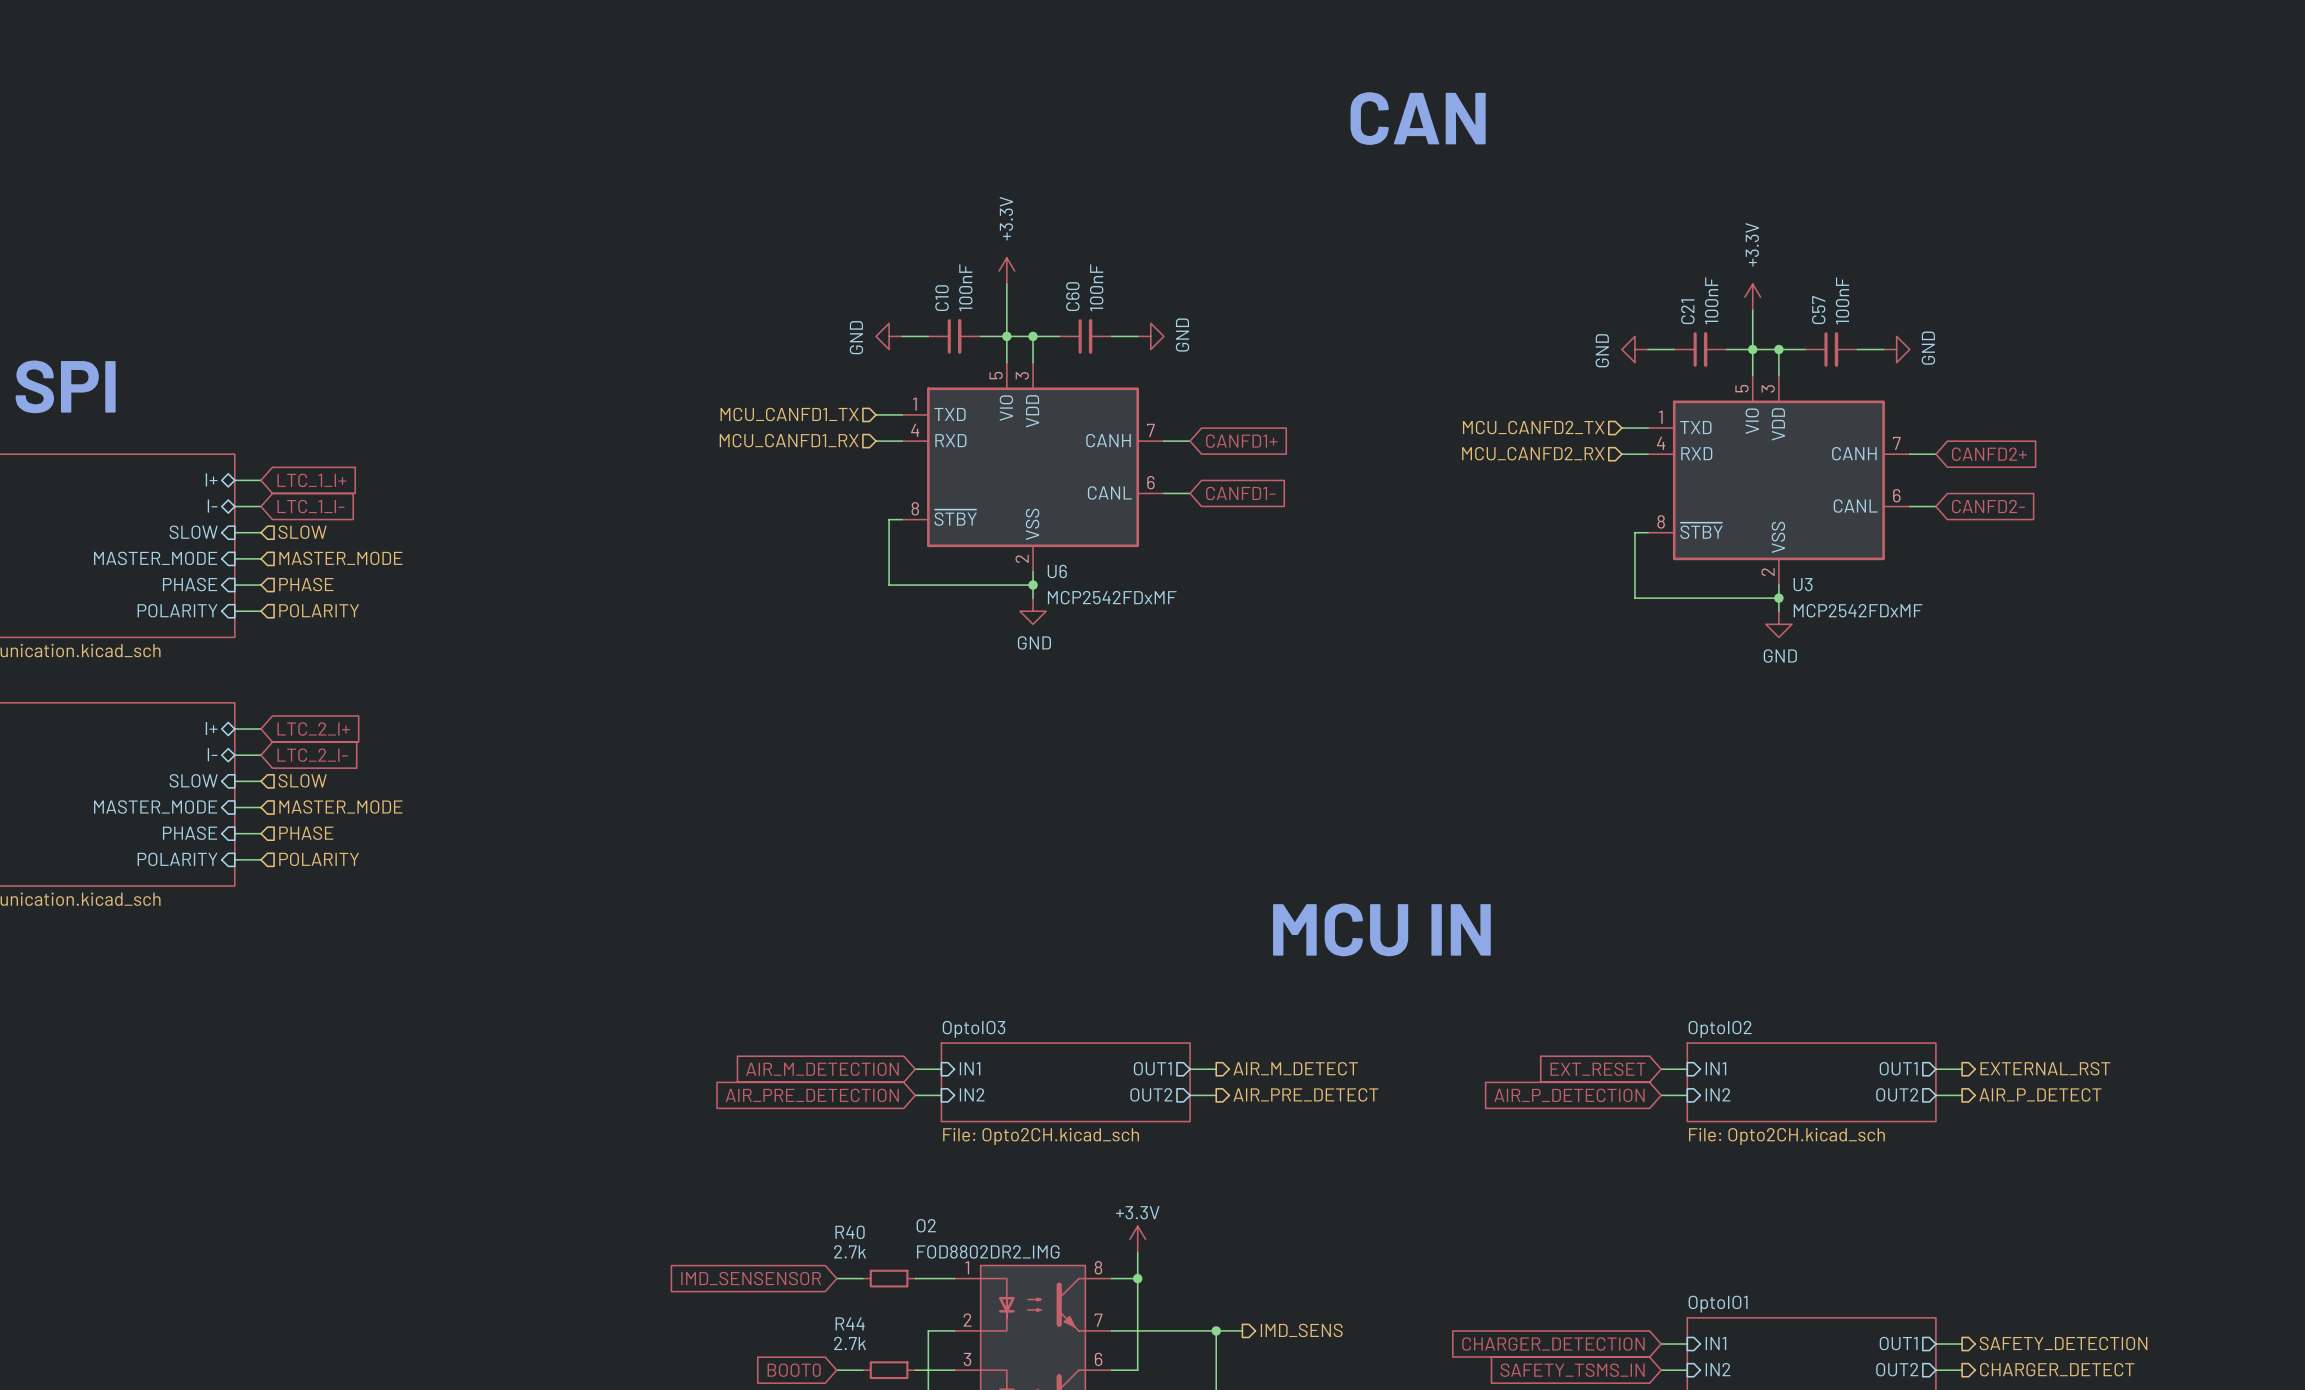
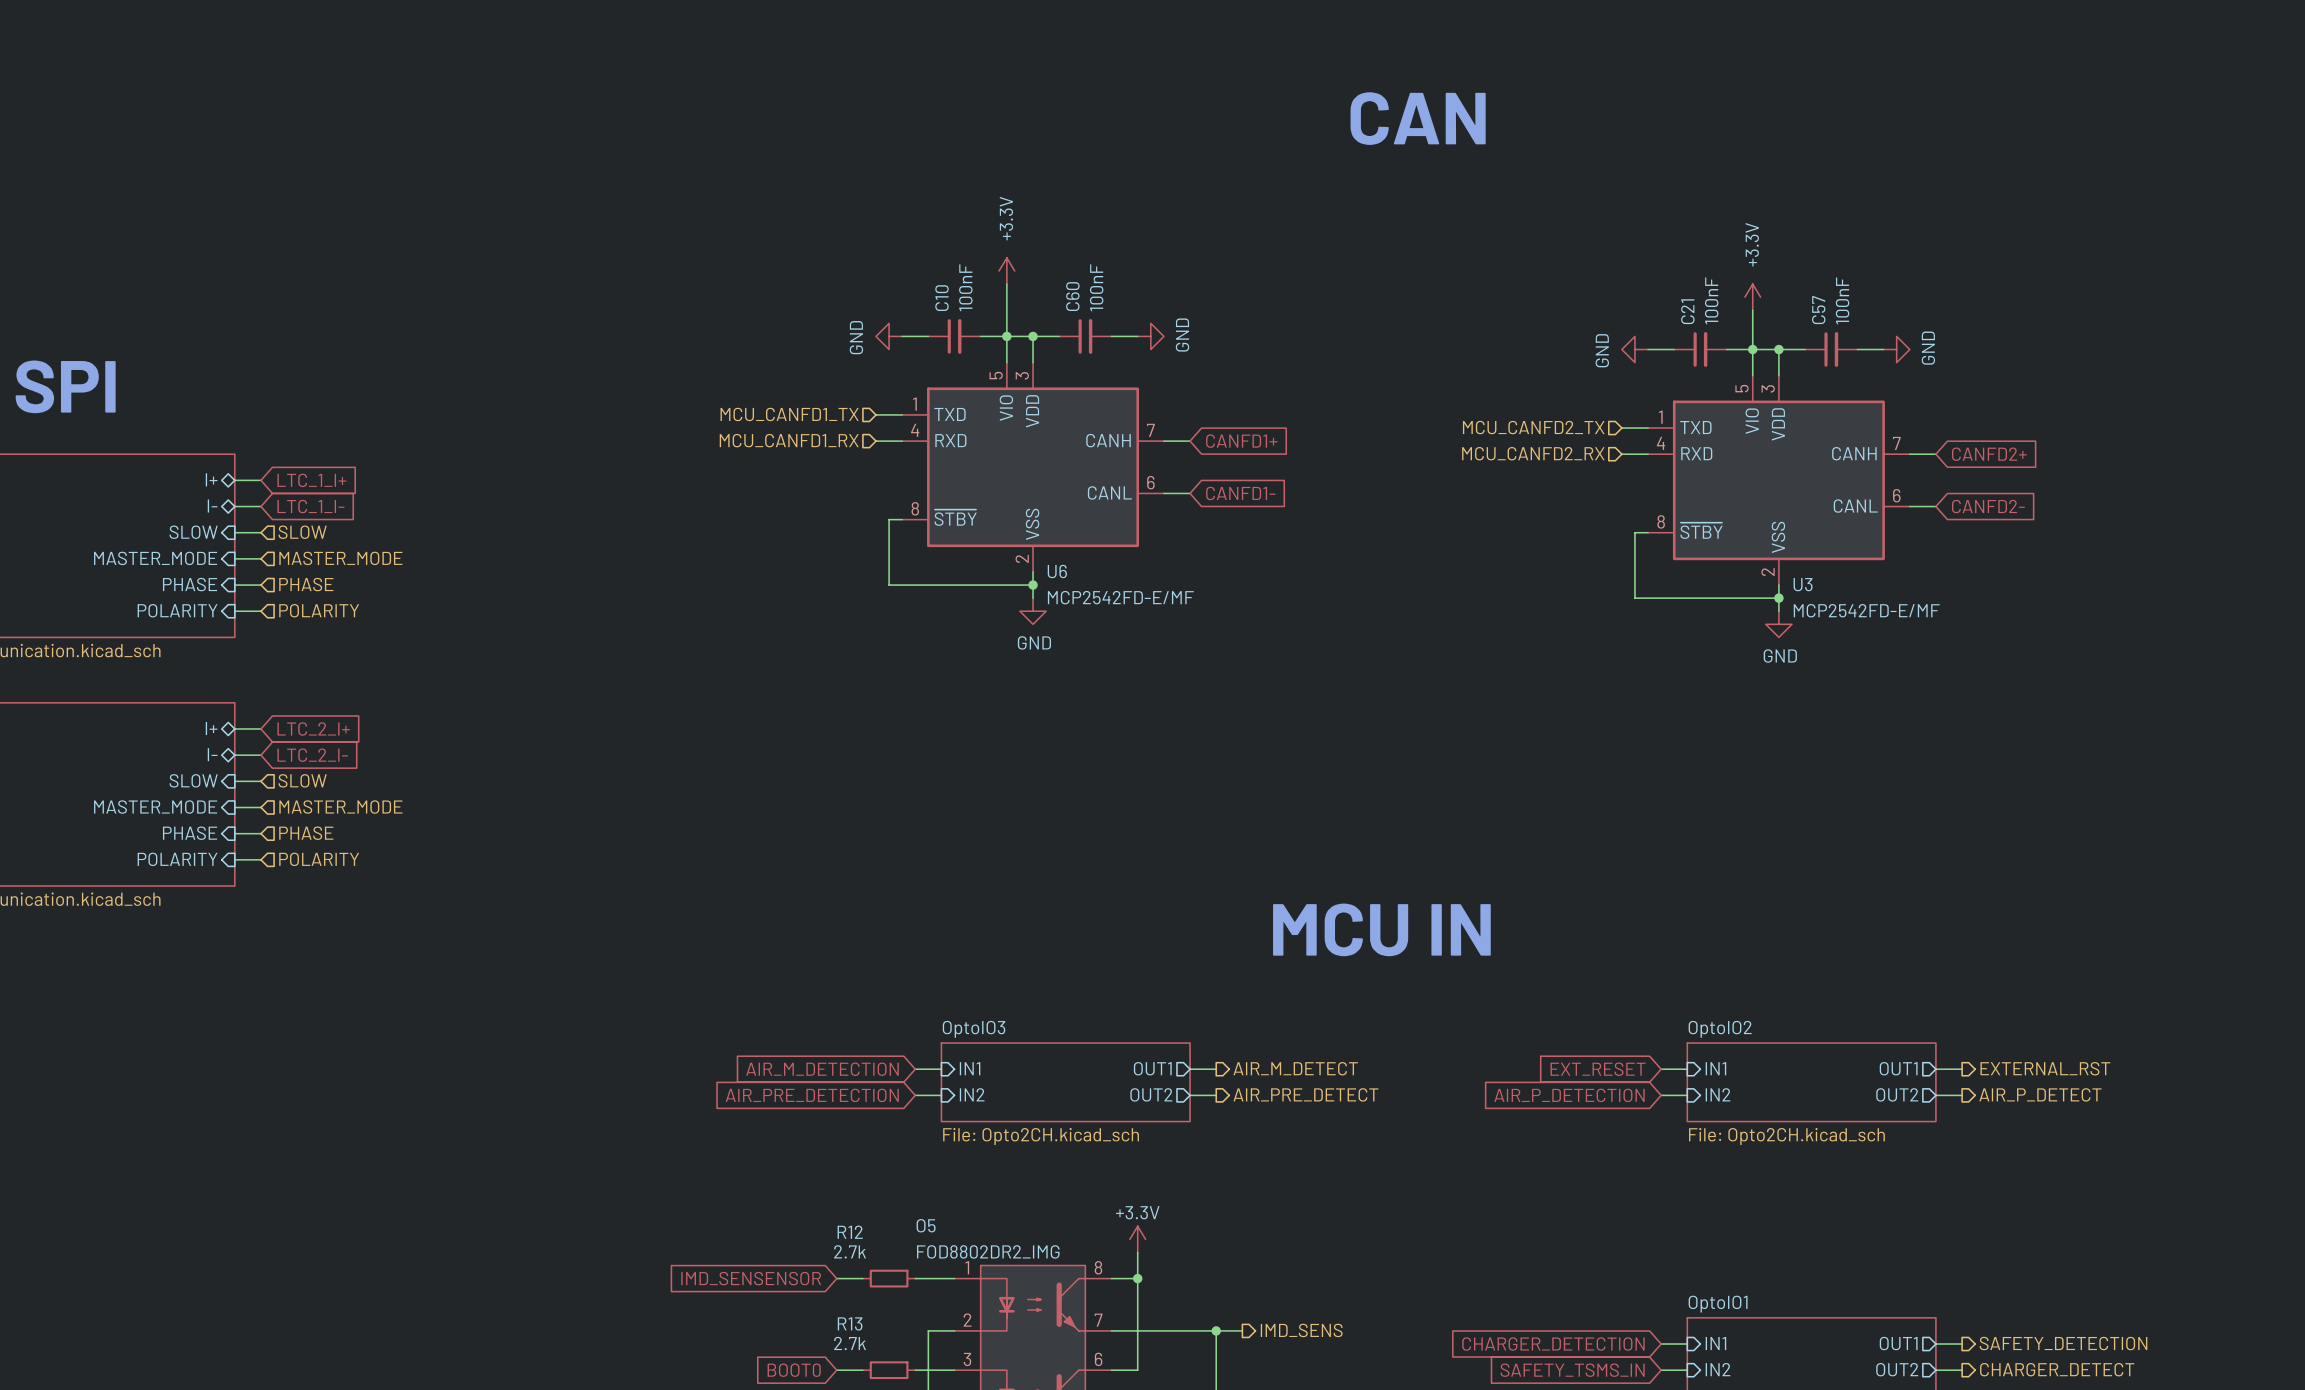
U6 value: MCP2542FDxMF (1112, 597) -> MCP2542FD-E/MF (1120, 597)
U3 value: MCP2542FDxMF (1858, 610) -> MCP2542FD-E/MF (1866, 610)
O2 name: O2 (926, 1225) -> O5 (926, 1225)
R40 name: R40 (850, 1232) -> R12 (850, 1232)
R44 name: R44 (850, 1323) -> R13 (850, 1323)

